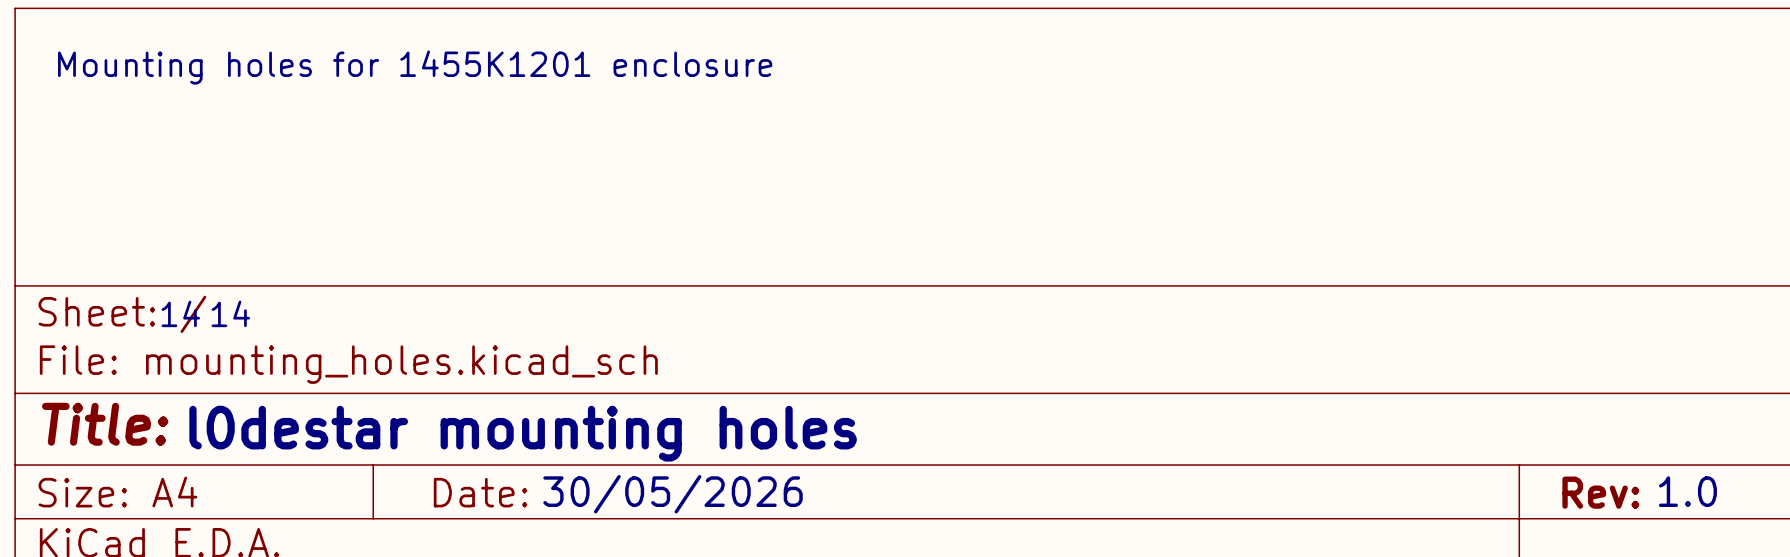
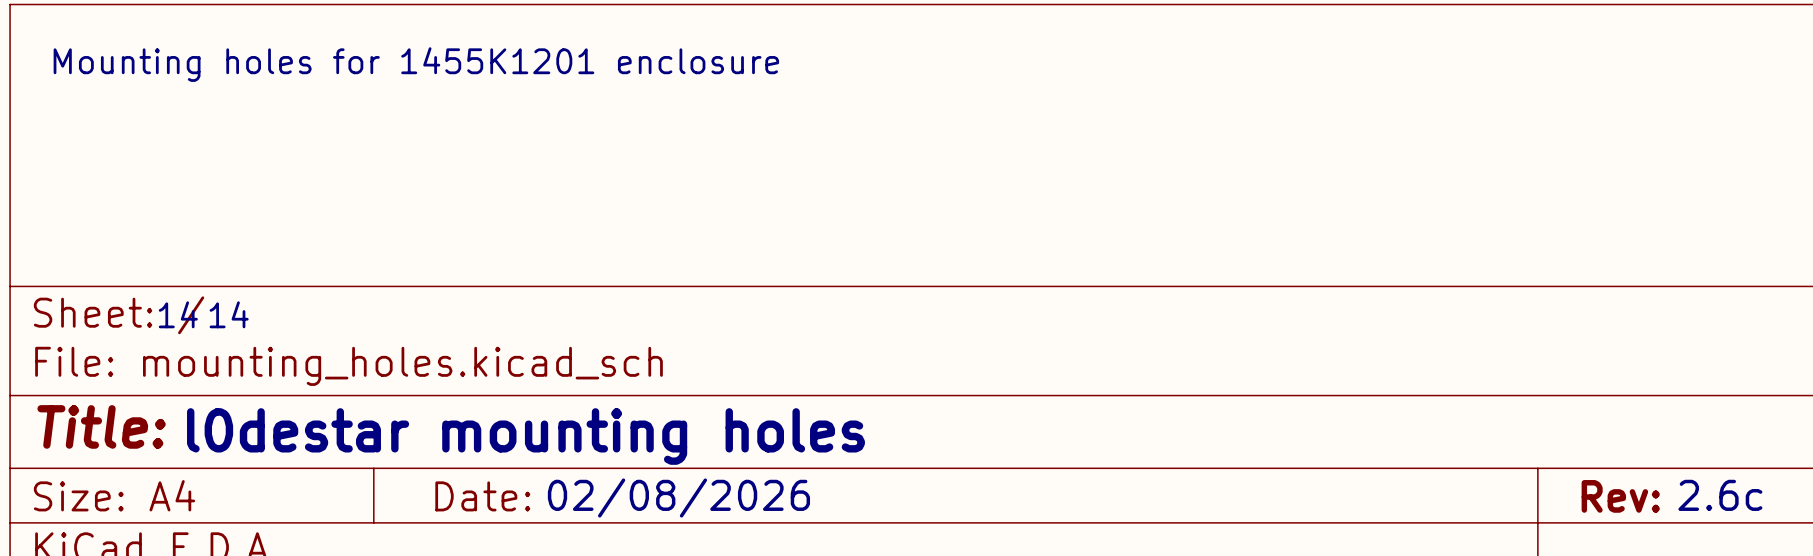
text: 1.0 (1687, 491) -> 2.6c (1720, 495)
text: 30/05/2026 (673, 494) -> 02/08/2026 (678, 498)

